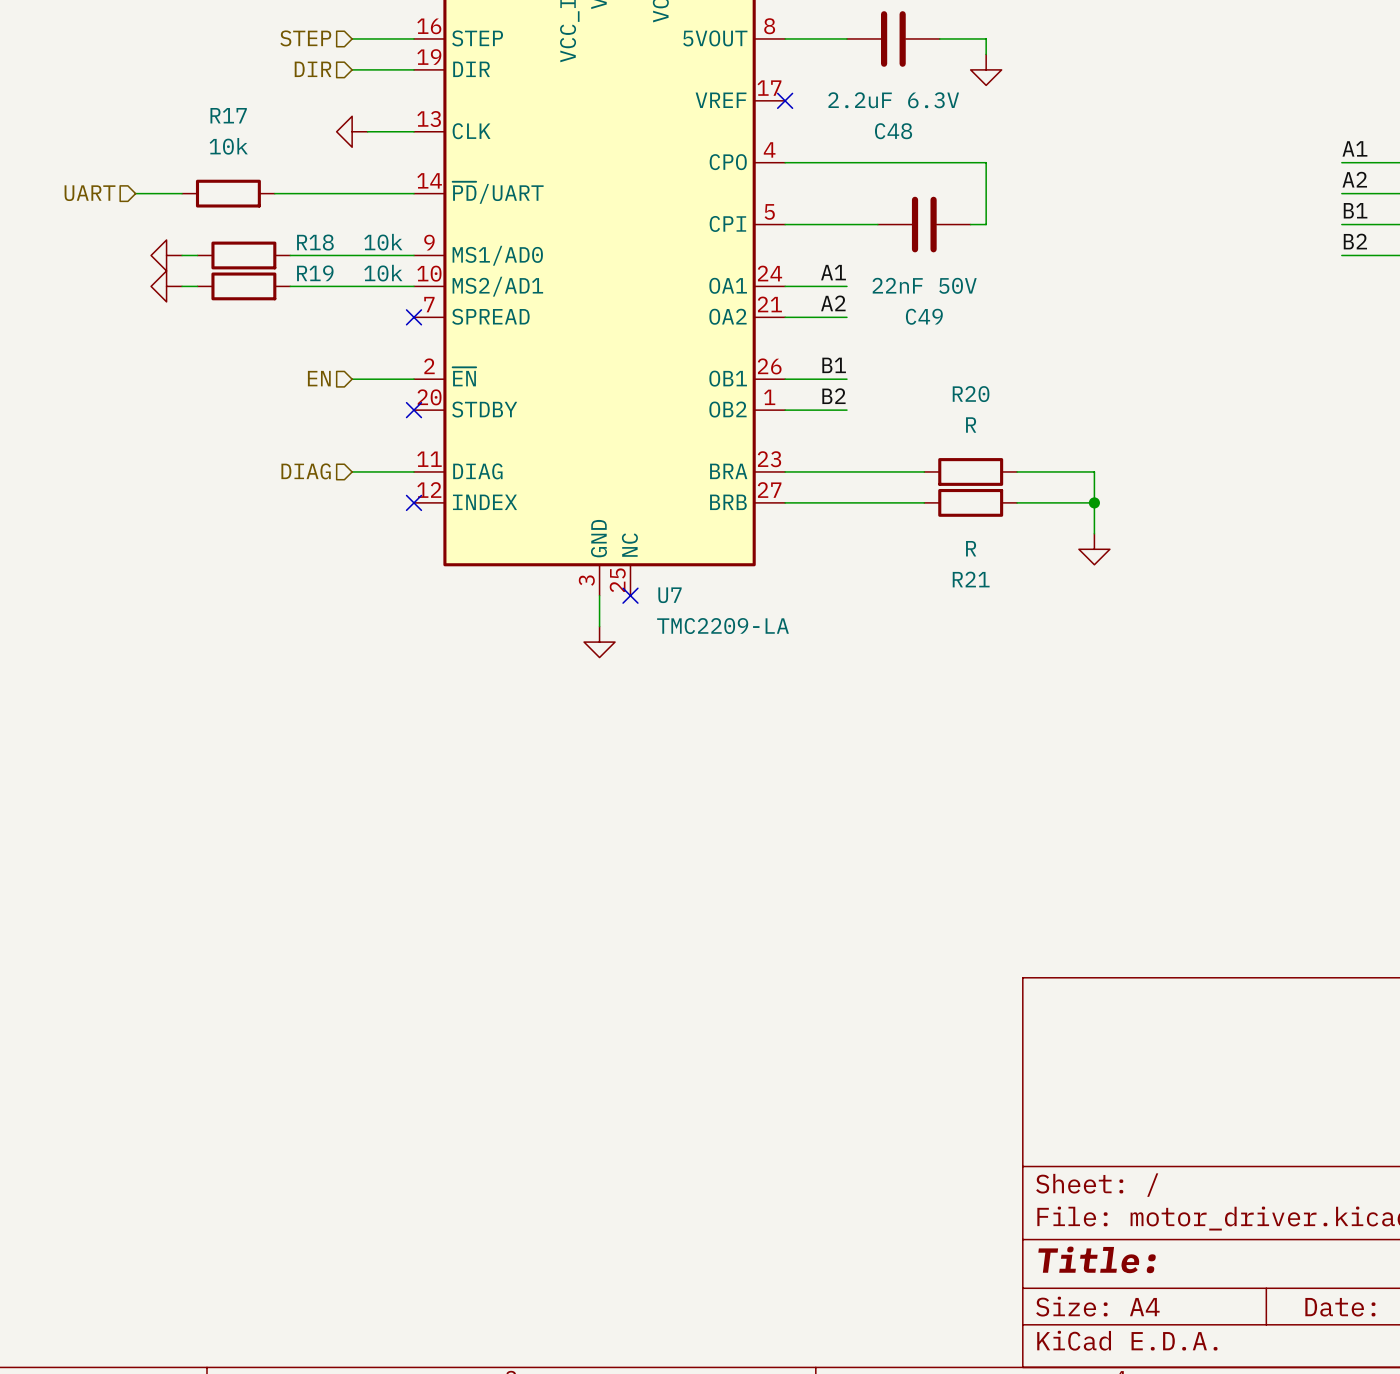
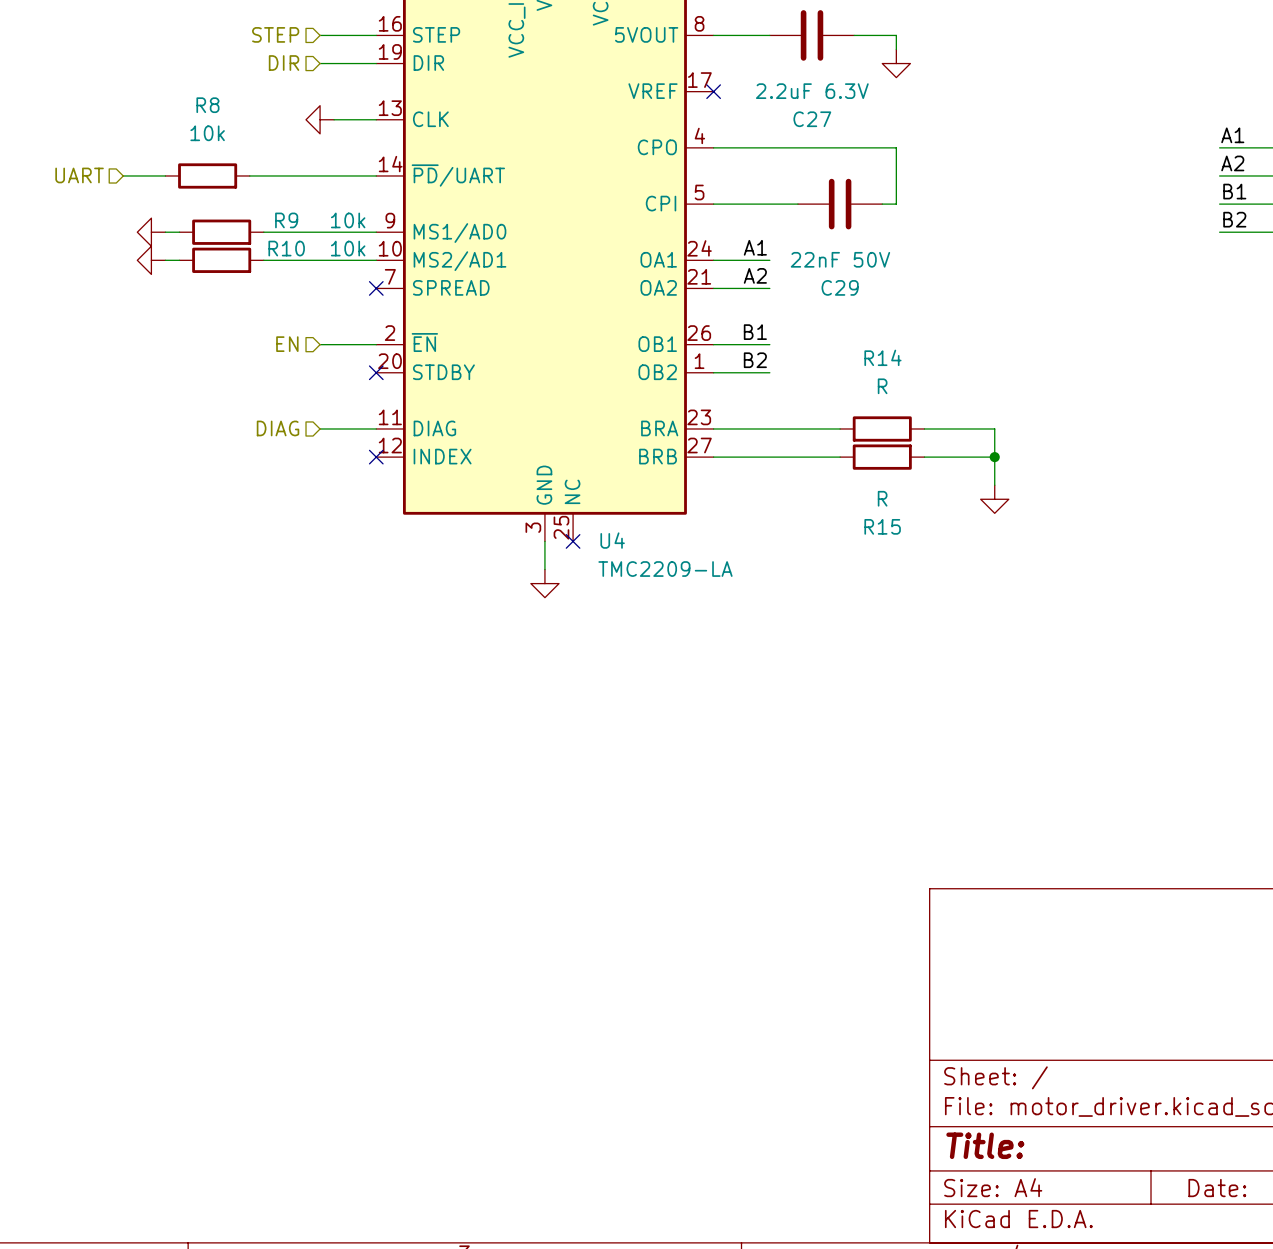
R17 name: R17 (228, 115) -> R8 (207, 105)
C48 name: C48 (893, 131) -> C27 (812, 119)
R18 name: R18 (315, 242) -> R9 (286, 220)
R19 name: R19 (315, 273) -> R10 (286, 248)
C49 name: C49 (924, 316) -> C29 (840, 287)
R20 name: R20 (971, 394) -> R14 (882, 357)
R21 name: R21 (971, 579) -> R15 (882, 526)
U7 name: U7 (669, 595) -> U4 (612, 540)

